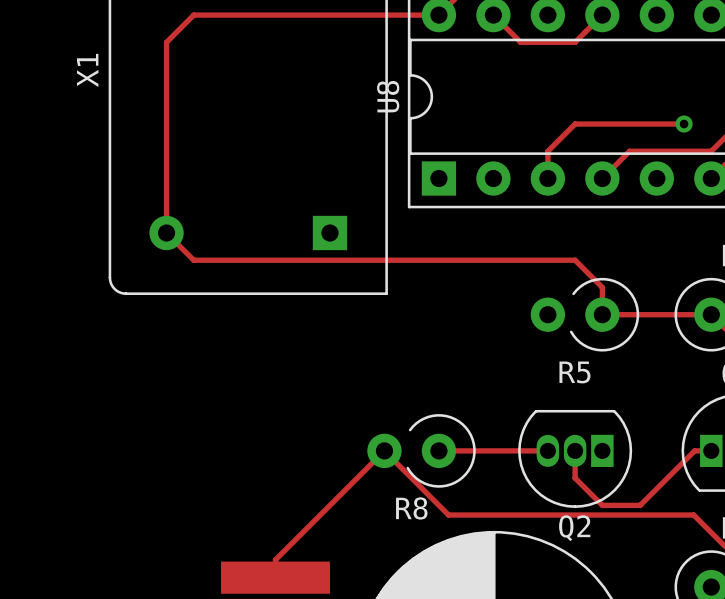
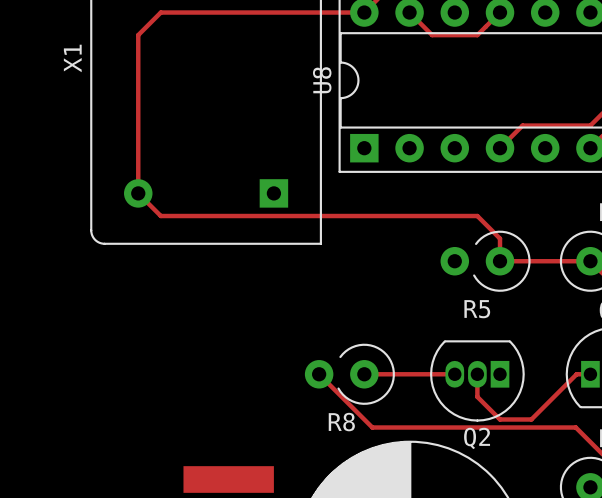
track: (684, 124) (575, 124) (547, 151) (547, 178) -> none
via: (684, 124) -> none
track: (384, 450) (275, 559) (275, 577) -> none

